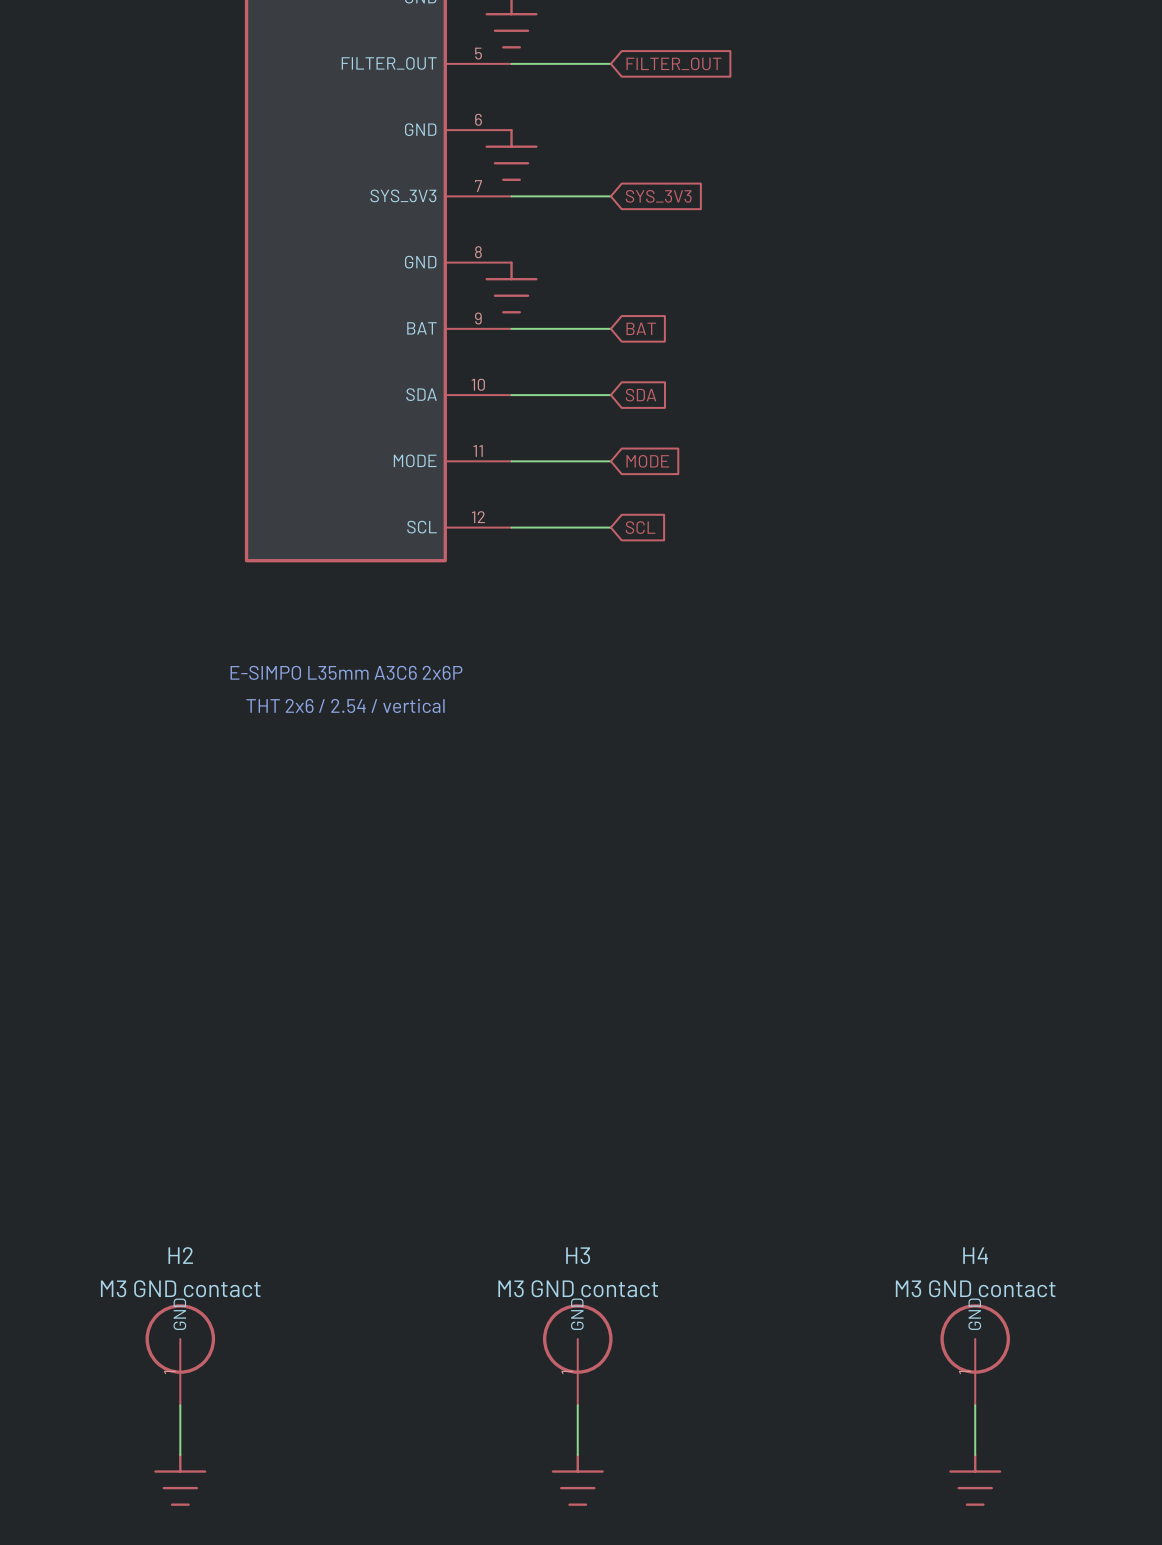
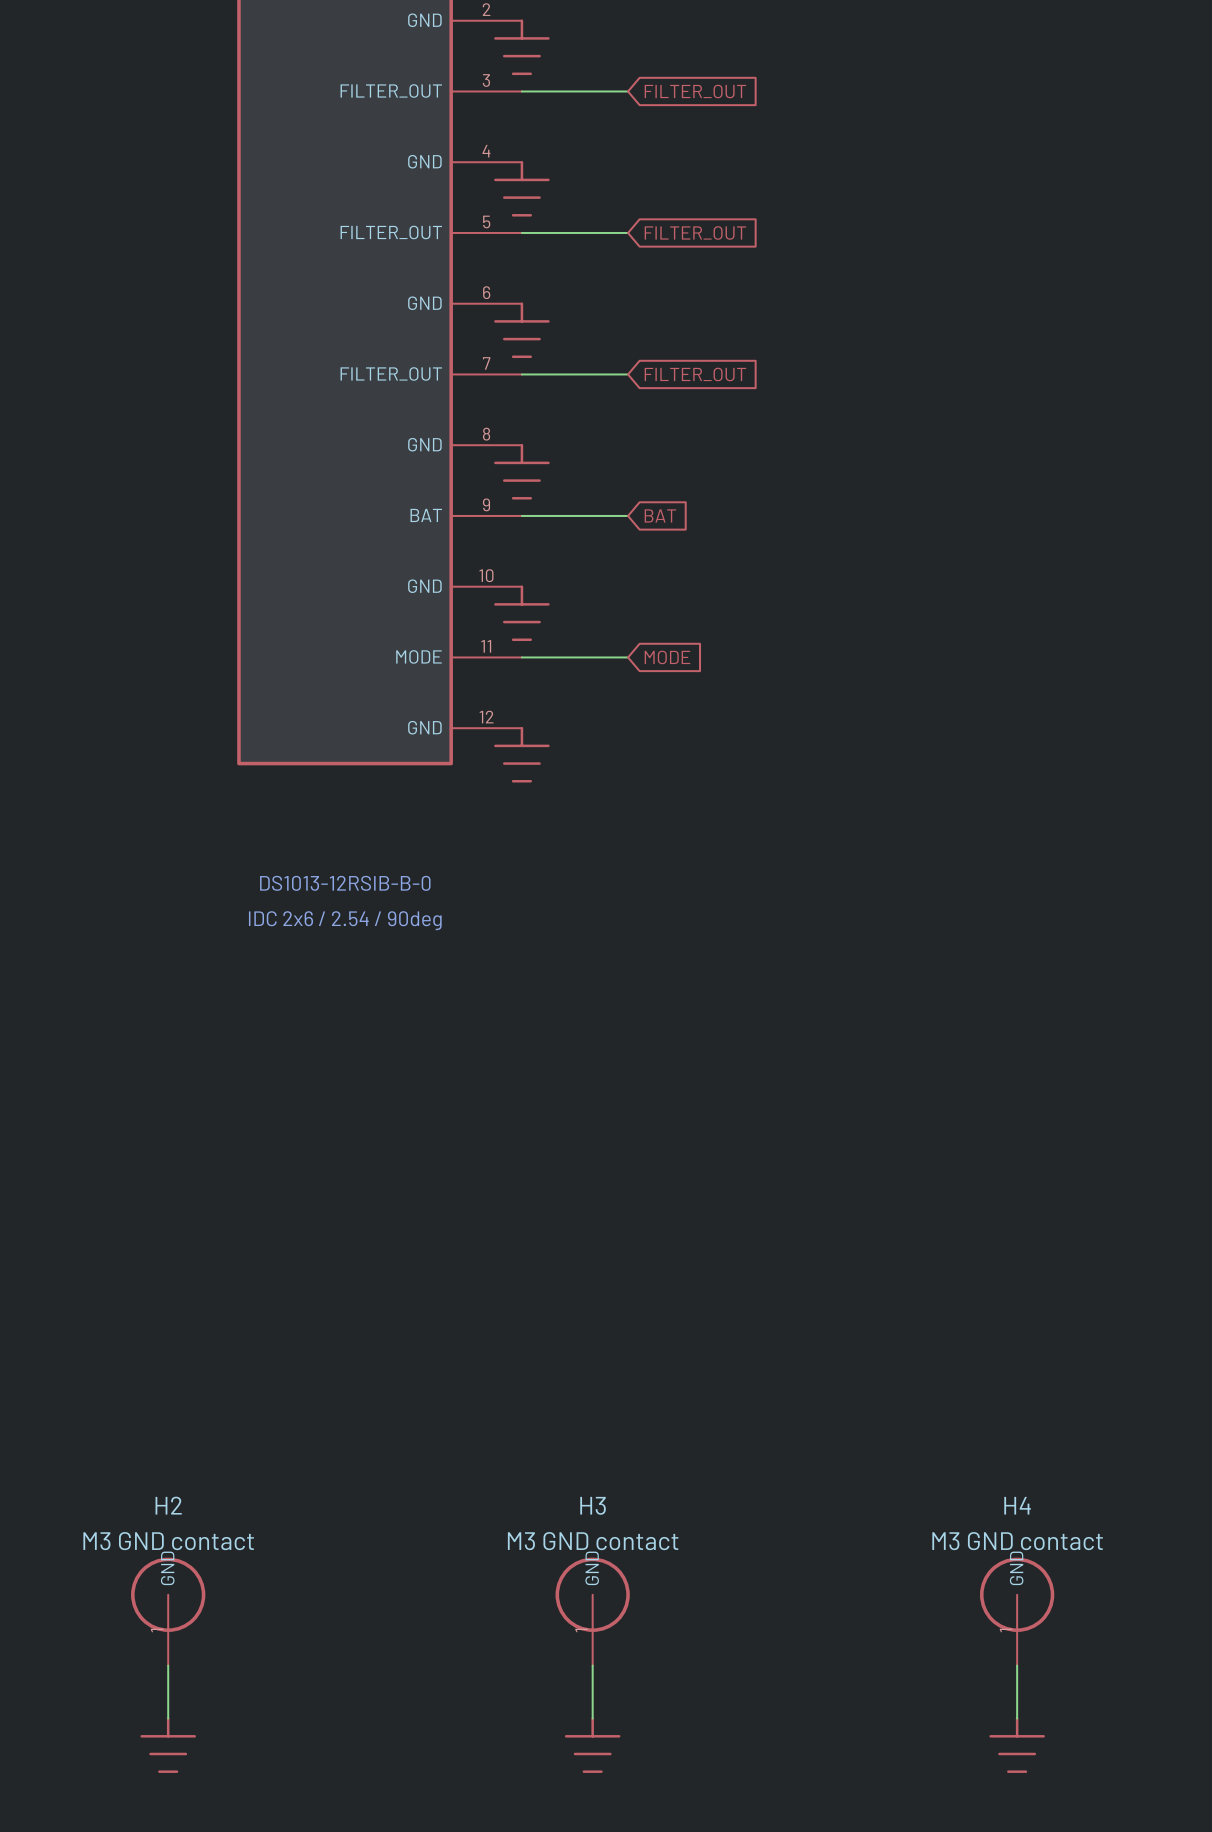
part pin name: SYS_3V3 (403, 195) -> FILTER_OUT (391, 373)
global label: SYS_3V3 (658, 196) -> FILTER_OUT (695, 374)
part pin name: SDA (421, 394) -> GND (424, 586)
wire: (511, 395) (610, 395) -> none
global label: SDA (640, 395) -> none
power symbol: none -> (521, 613)
part pin name: SCL (422, 527) -> GND (424, 727)
wire: (511, 527) (610, 527) -> none
global label: SCL (640, 527) -> none
power symbol: none -> (521, 754)
text: E-SIMPO L35mm A3C6 2x6P (346, 672) -> DS1013-12RSIB-B-0 (345, 883)
text: THT 2x6 / 2.54 / vertical (345, 705) -> IDC 2x6 / 2.54 / 90deg (345, 920)

